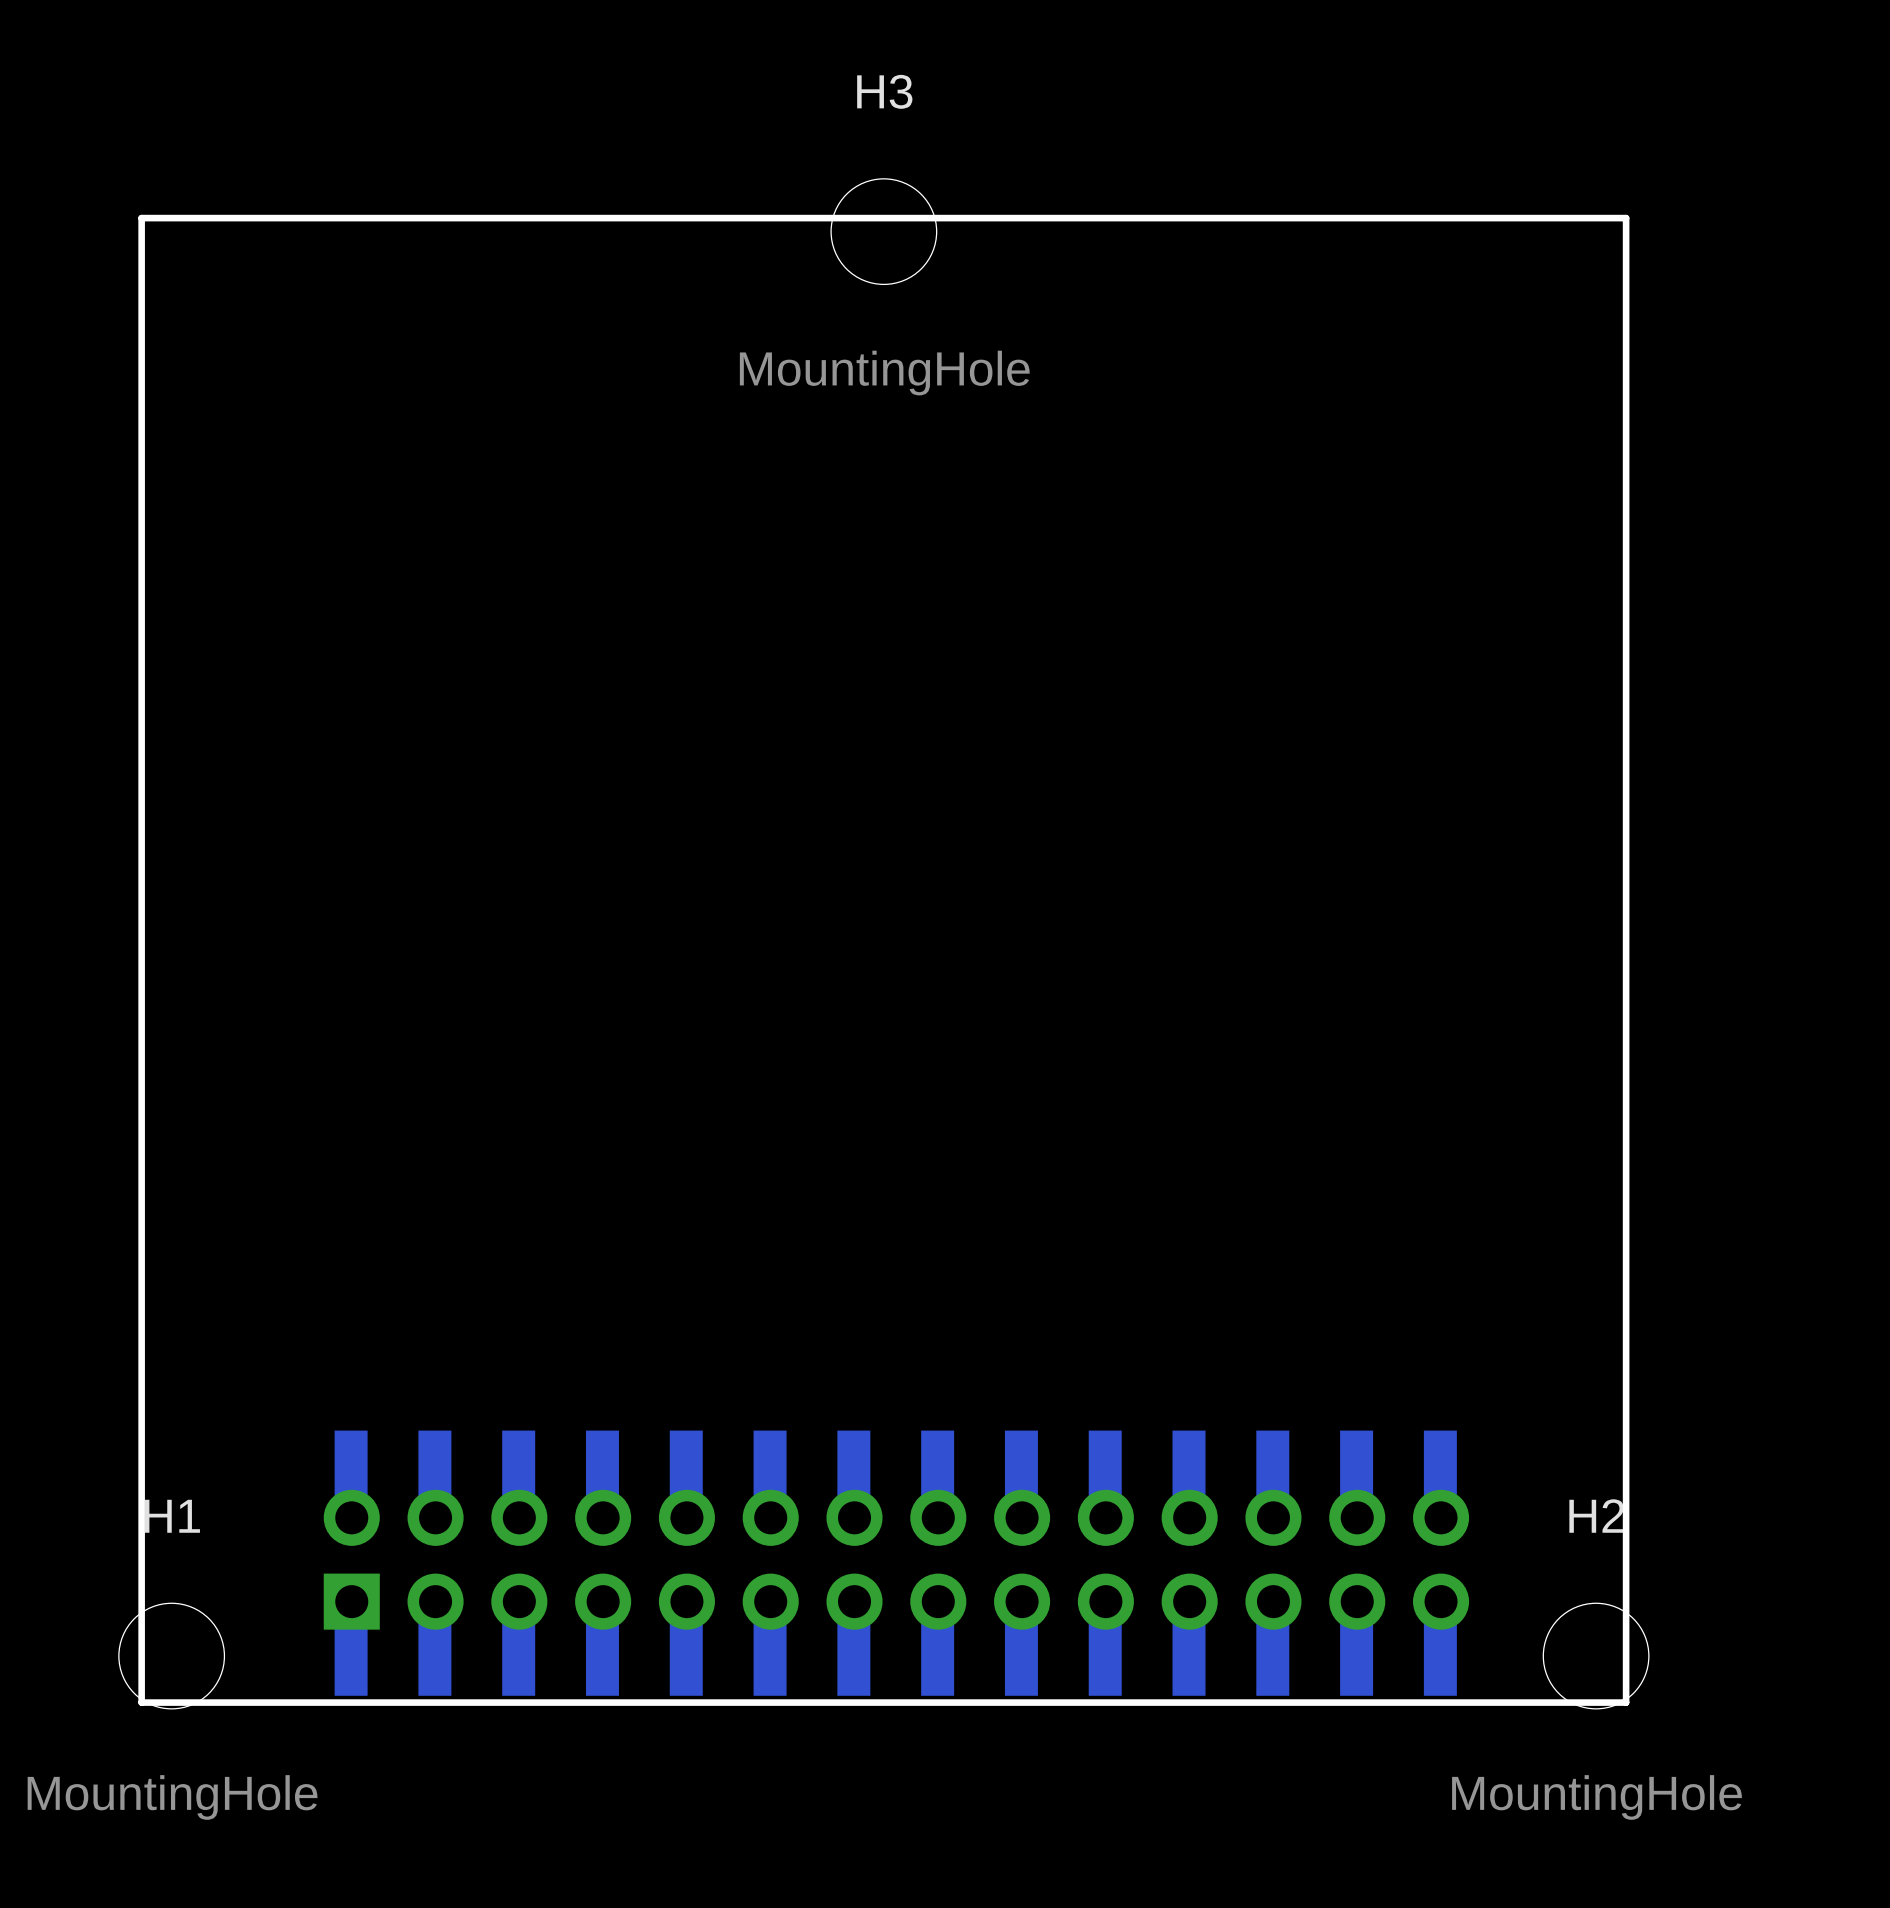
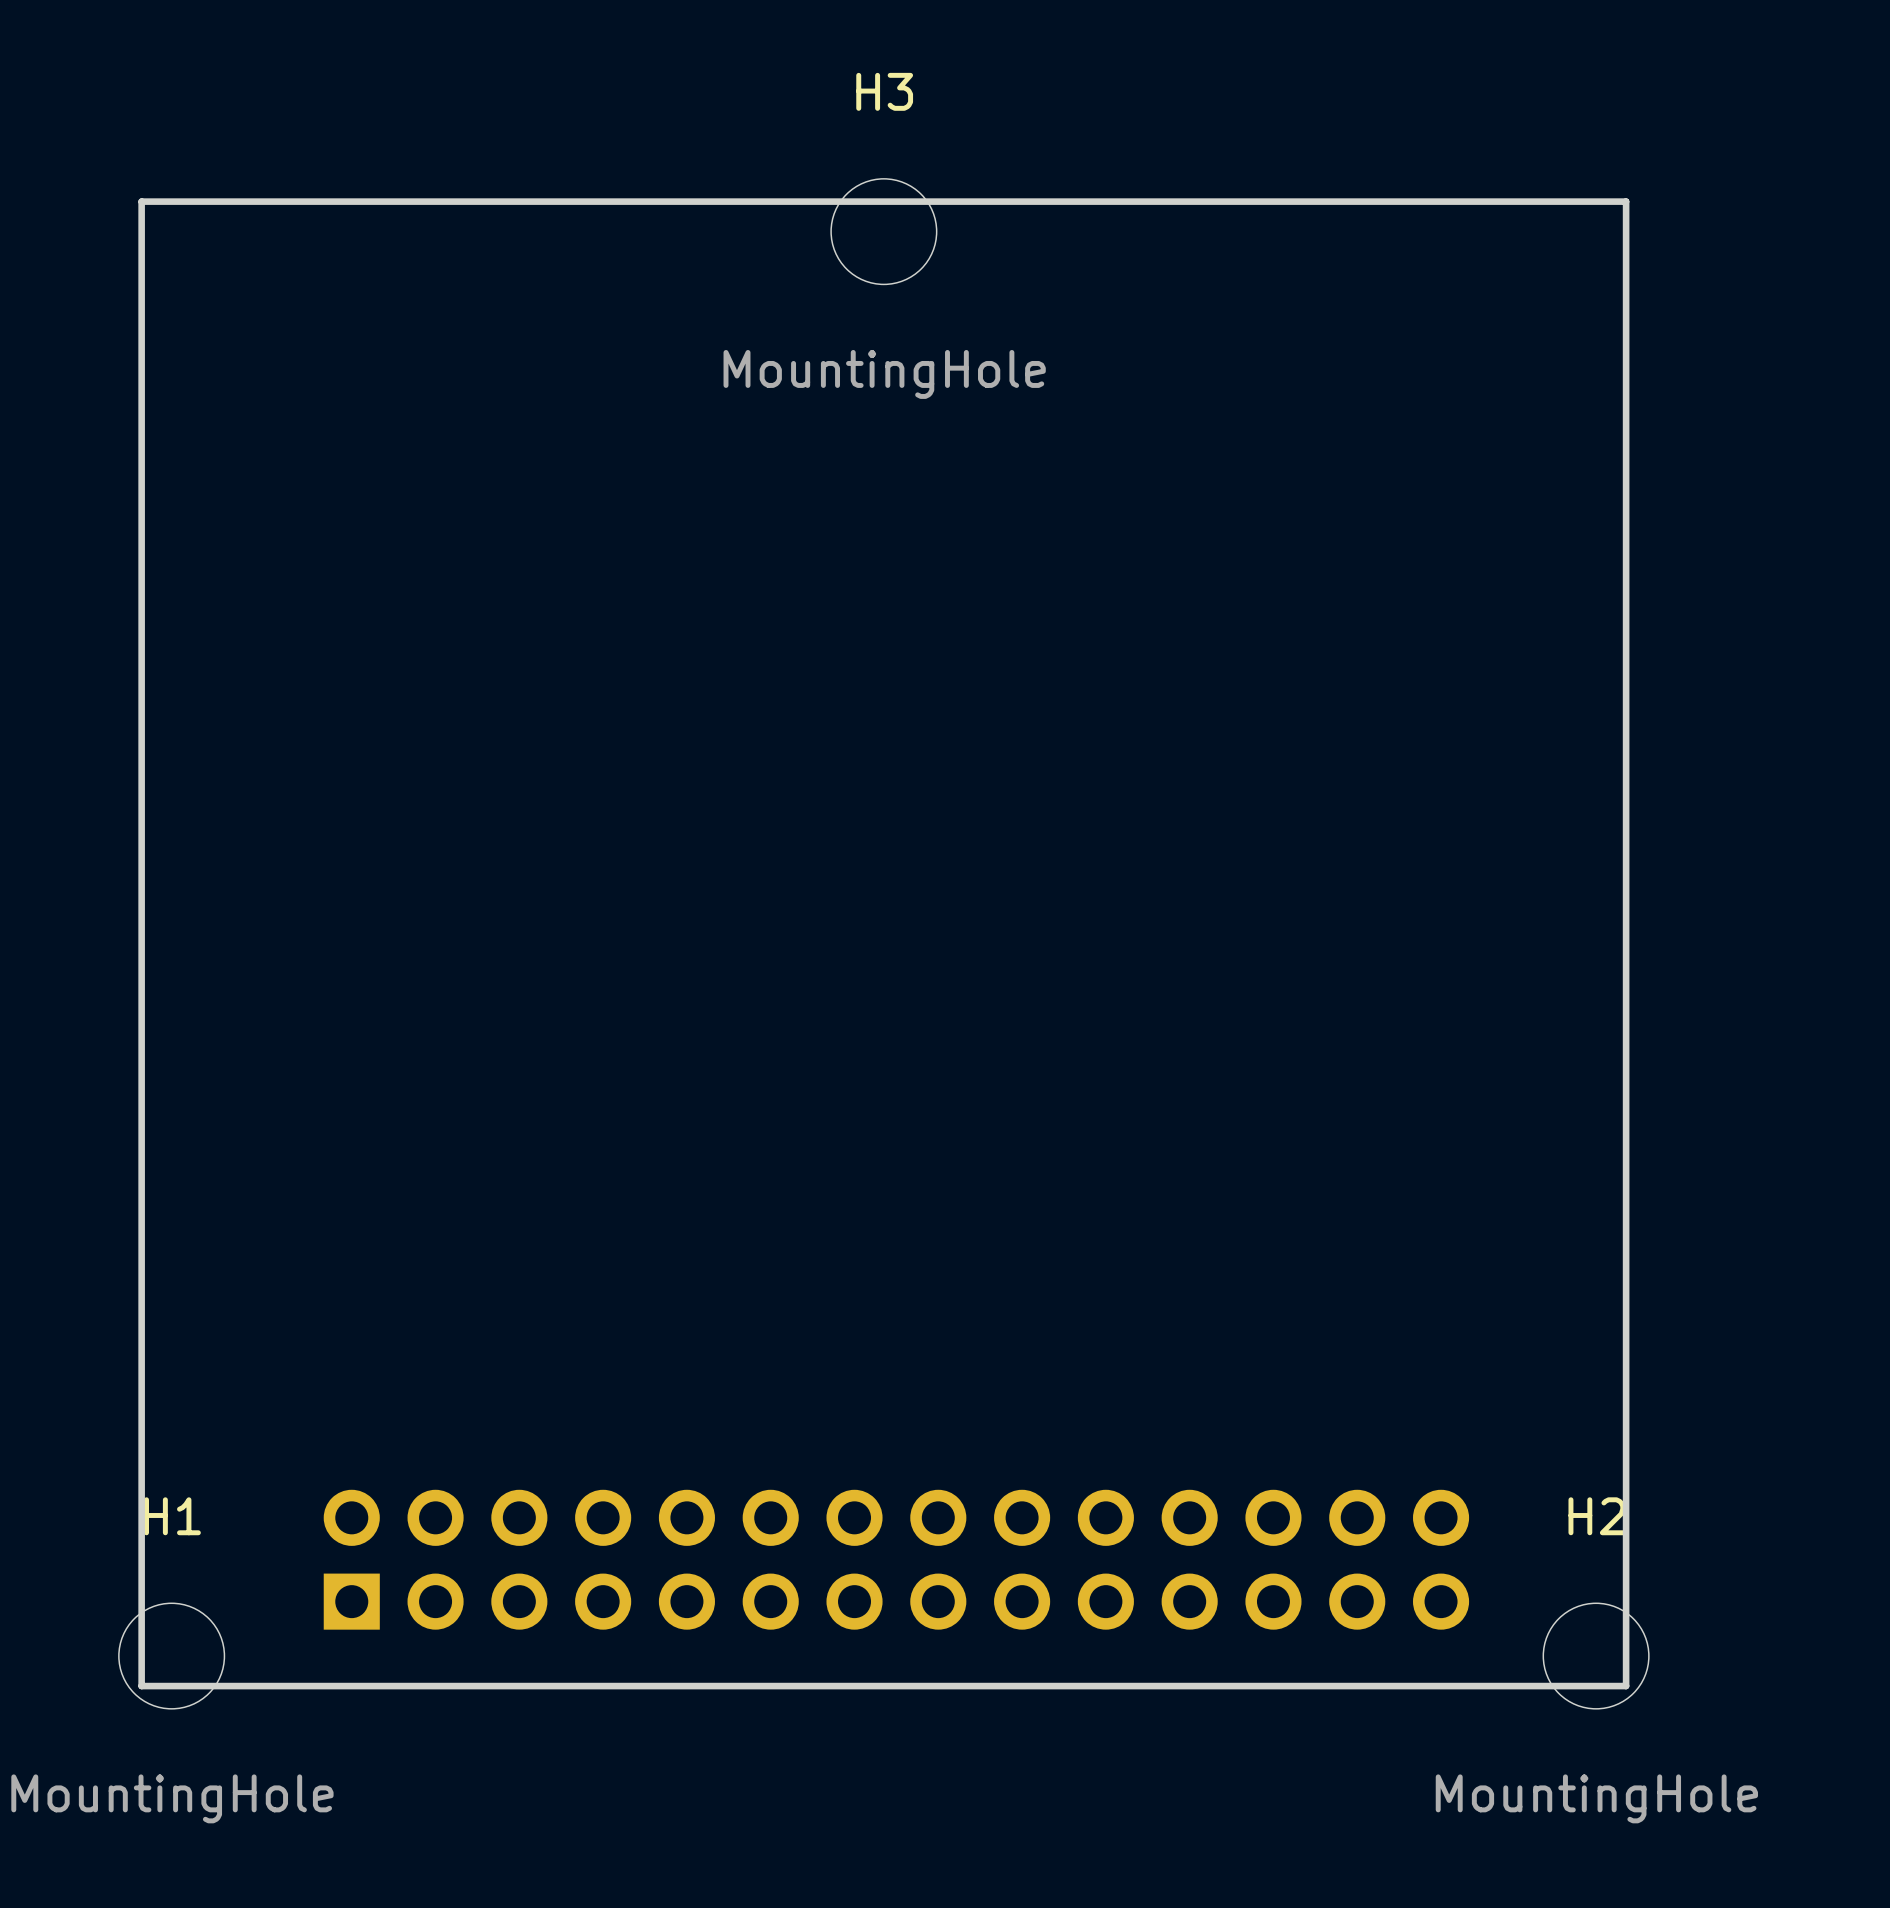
board edge: (141, 218) (1626, 218) -> (141, 218) (141, 201) (1626, 201) (1626, 218)
part: (895, 1563) -> none
board edge: (141, 1686) (141, 1702) (1626, 1702) (1626, 1686) -> (141, 1686) (1626, 1686)

